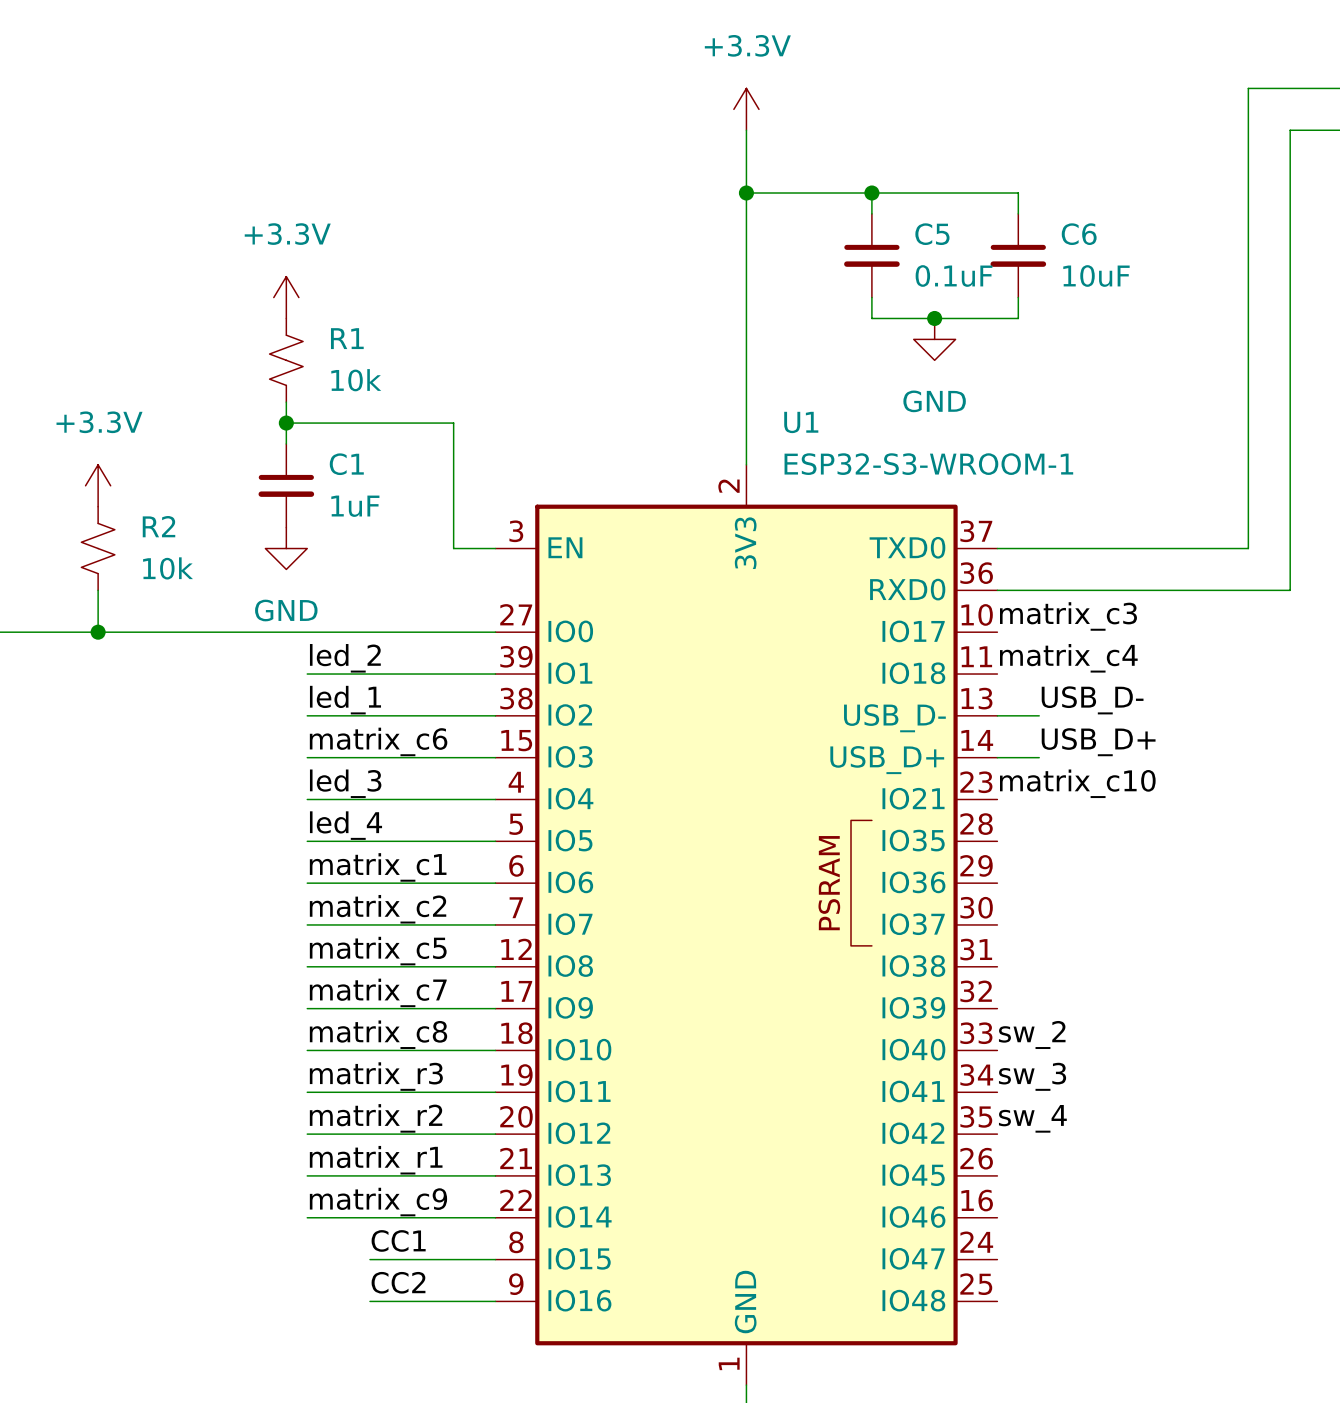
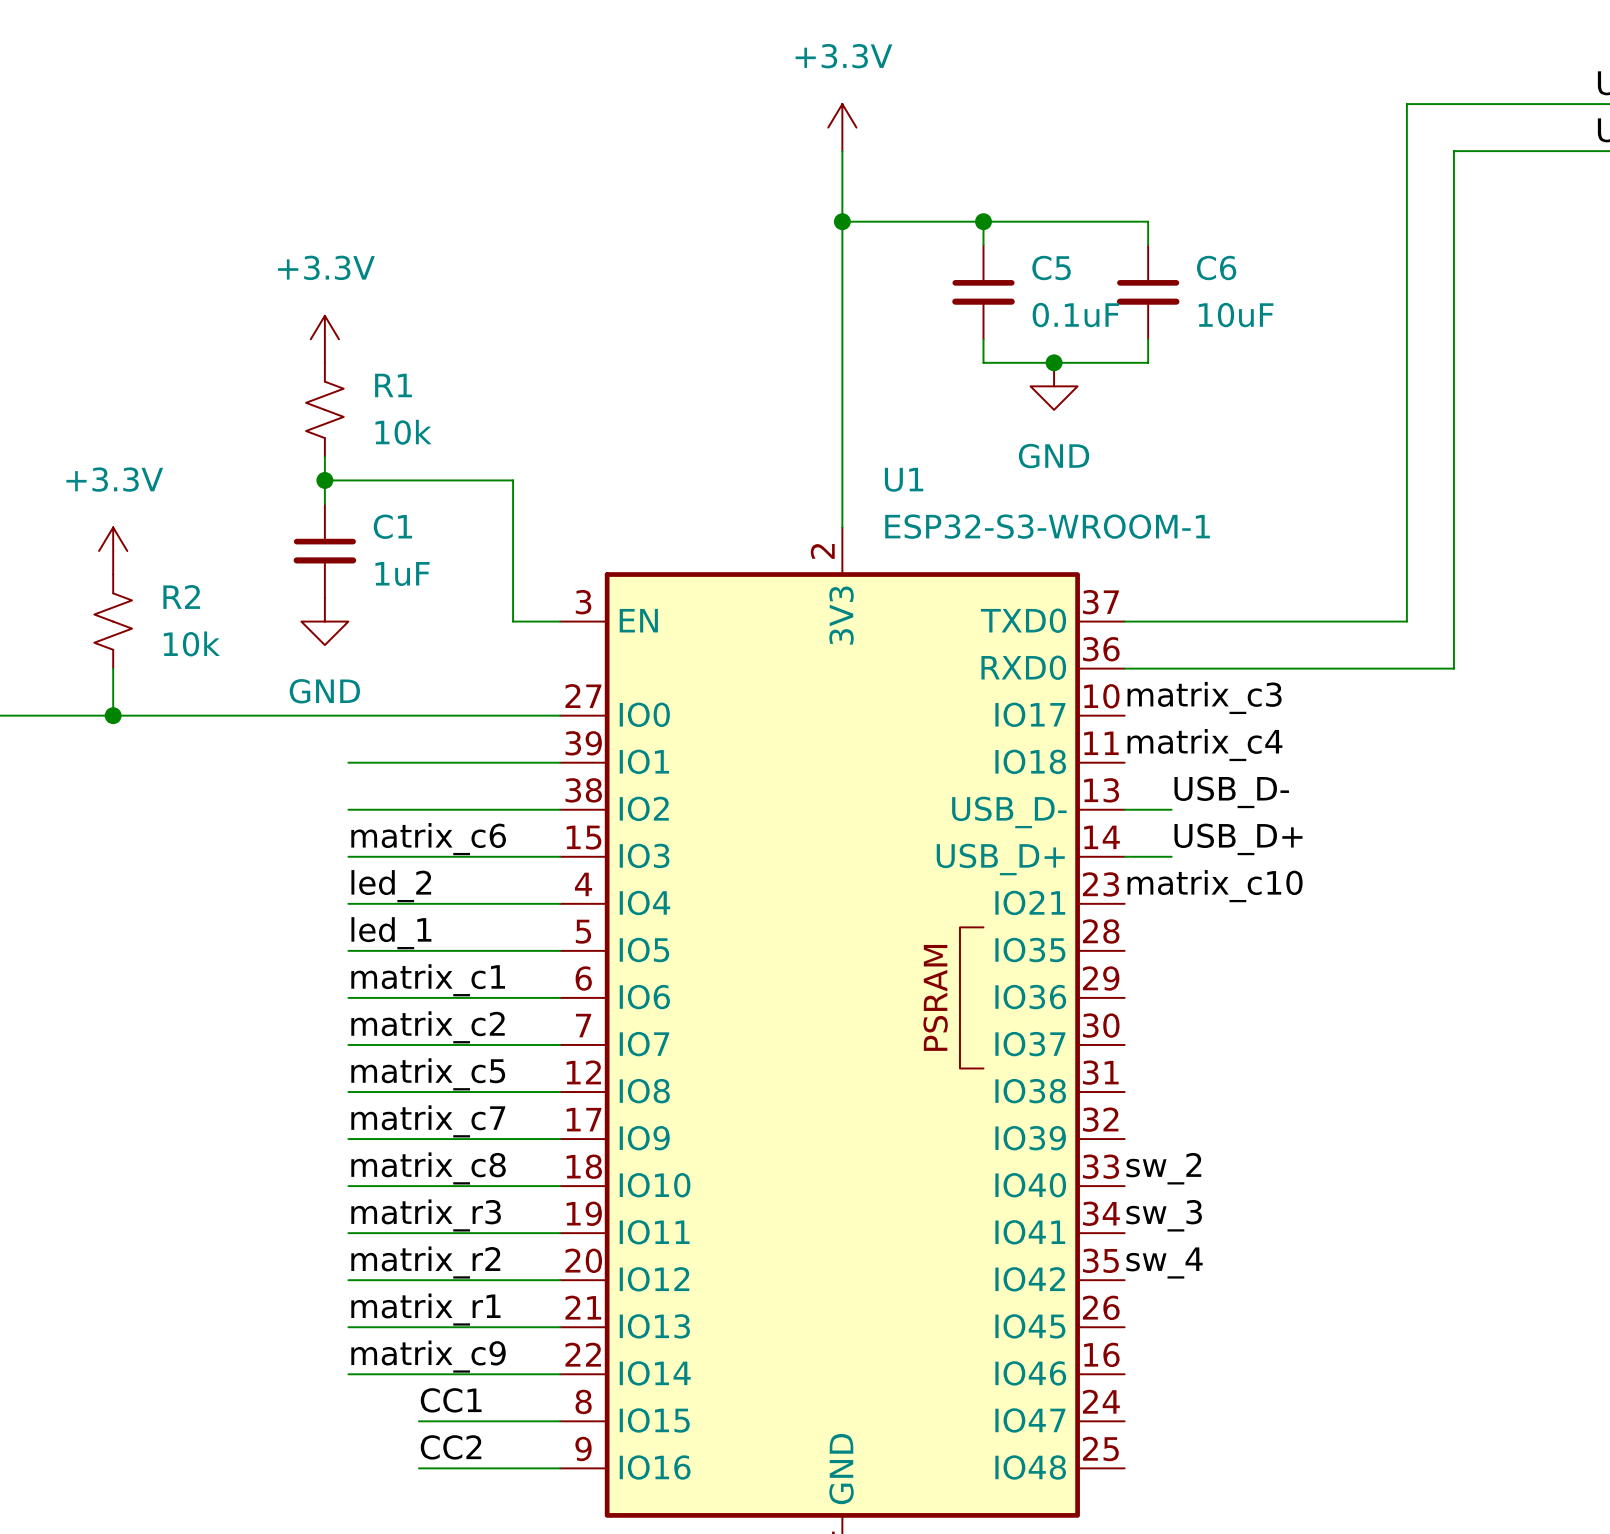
label: led_2 (345, 658) -> none
label: led_1 (345, 700) -> none
label: led_3 (345, 783) -> led_2 (391, 886)
label: led_4 (346, 825) -> led_1 (391, 933)

